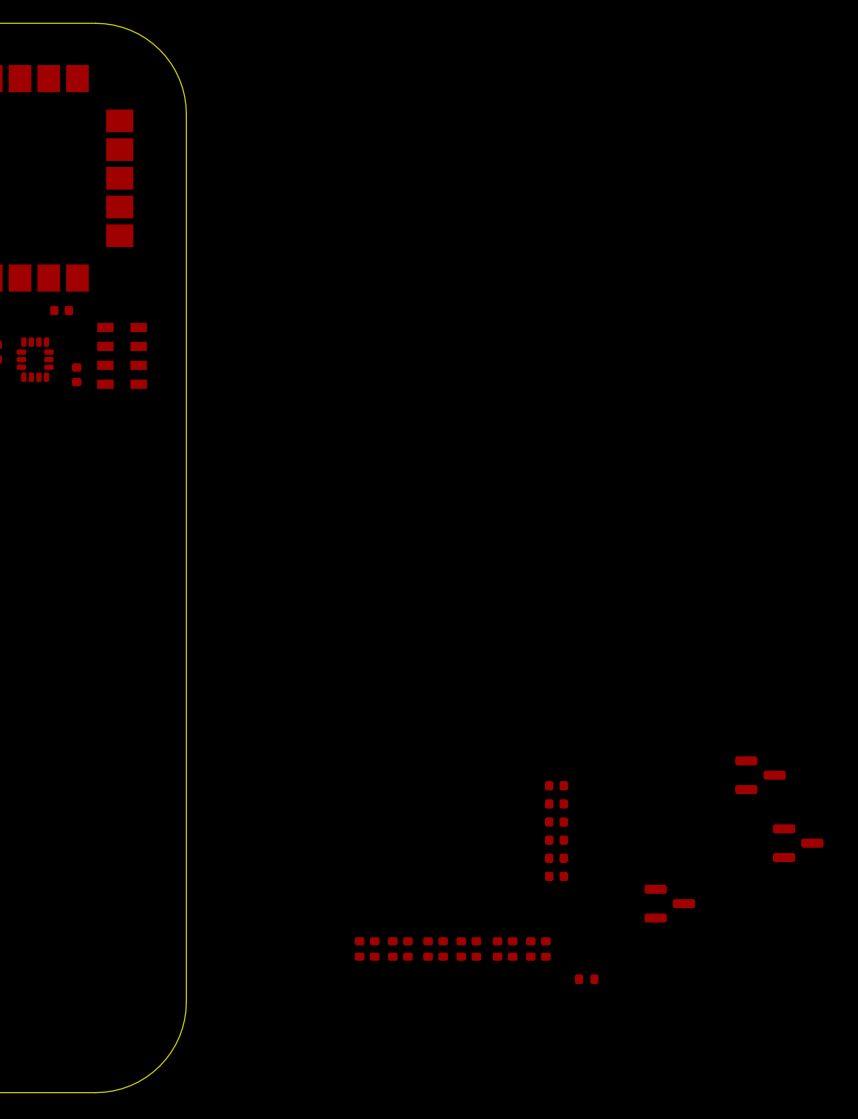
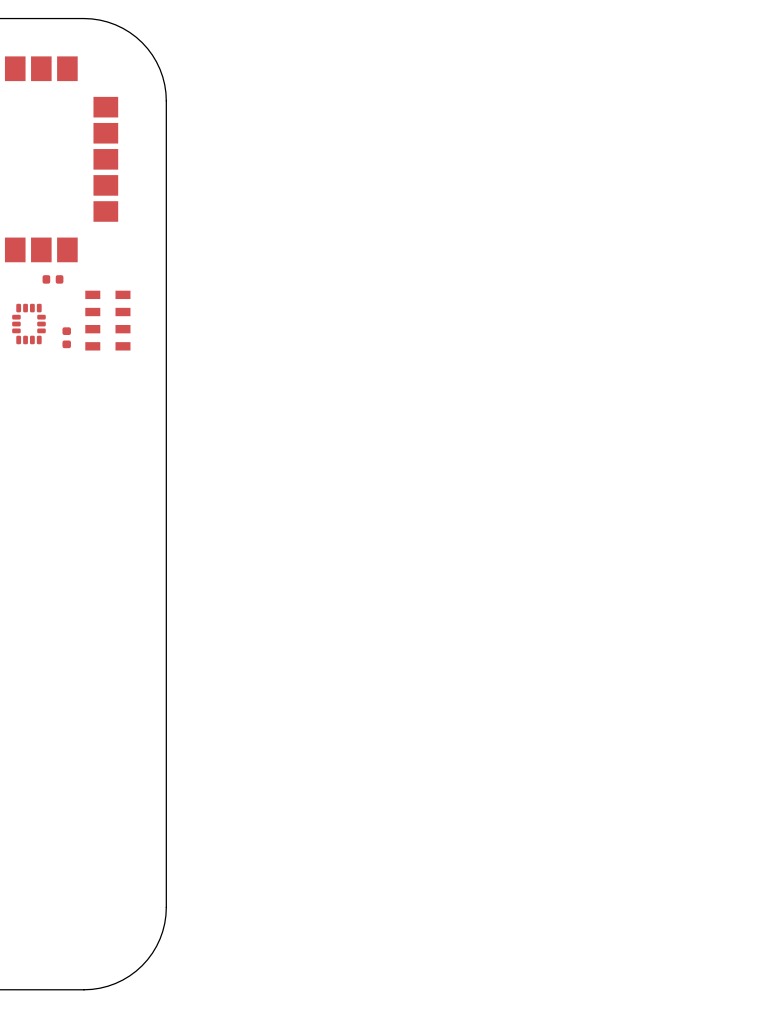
part: (760, 775) -> none
part: (556, 785) -> none
part: (556, 803) -> none
part: (556, 822) -> none
part: (556, 840) -> none
part: (798, 843) -> none
part: (556, 858) -> none
part: (556, 876) -> none
part: (669, 903) -> none
part: (359, 948) -> none
part: (374, 948) -> none
part: (392, 948) -> none
part: (407, 948) -> none
part: (428, 948) -> none
part: (443, 948) -> none
part: (461, 948) -> none
part: (476, 948) -> none
part: (497, 948) -> none
part: (512, 948) -> none
part: (530, 948) -> none
part: (545, 948) -> none
part: (586, 979) -> none

